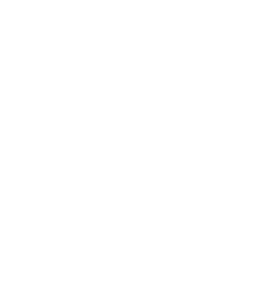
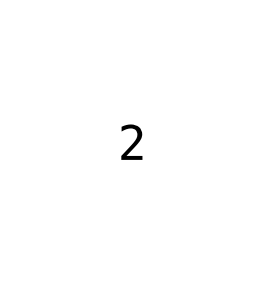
text: none -> 2 (131, 142)

